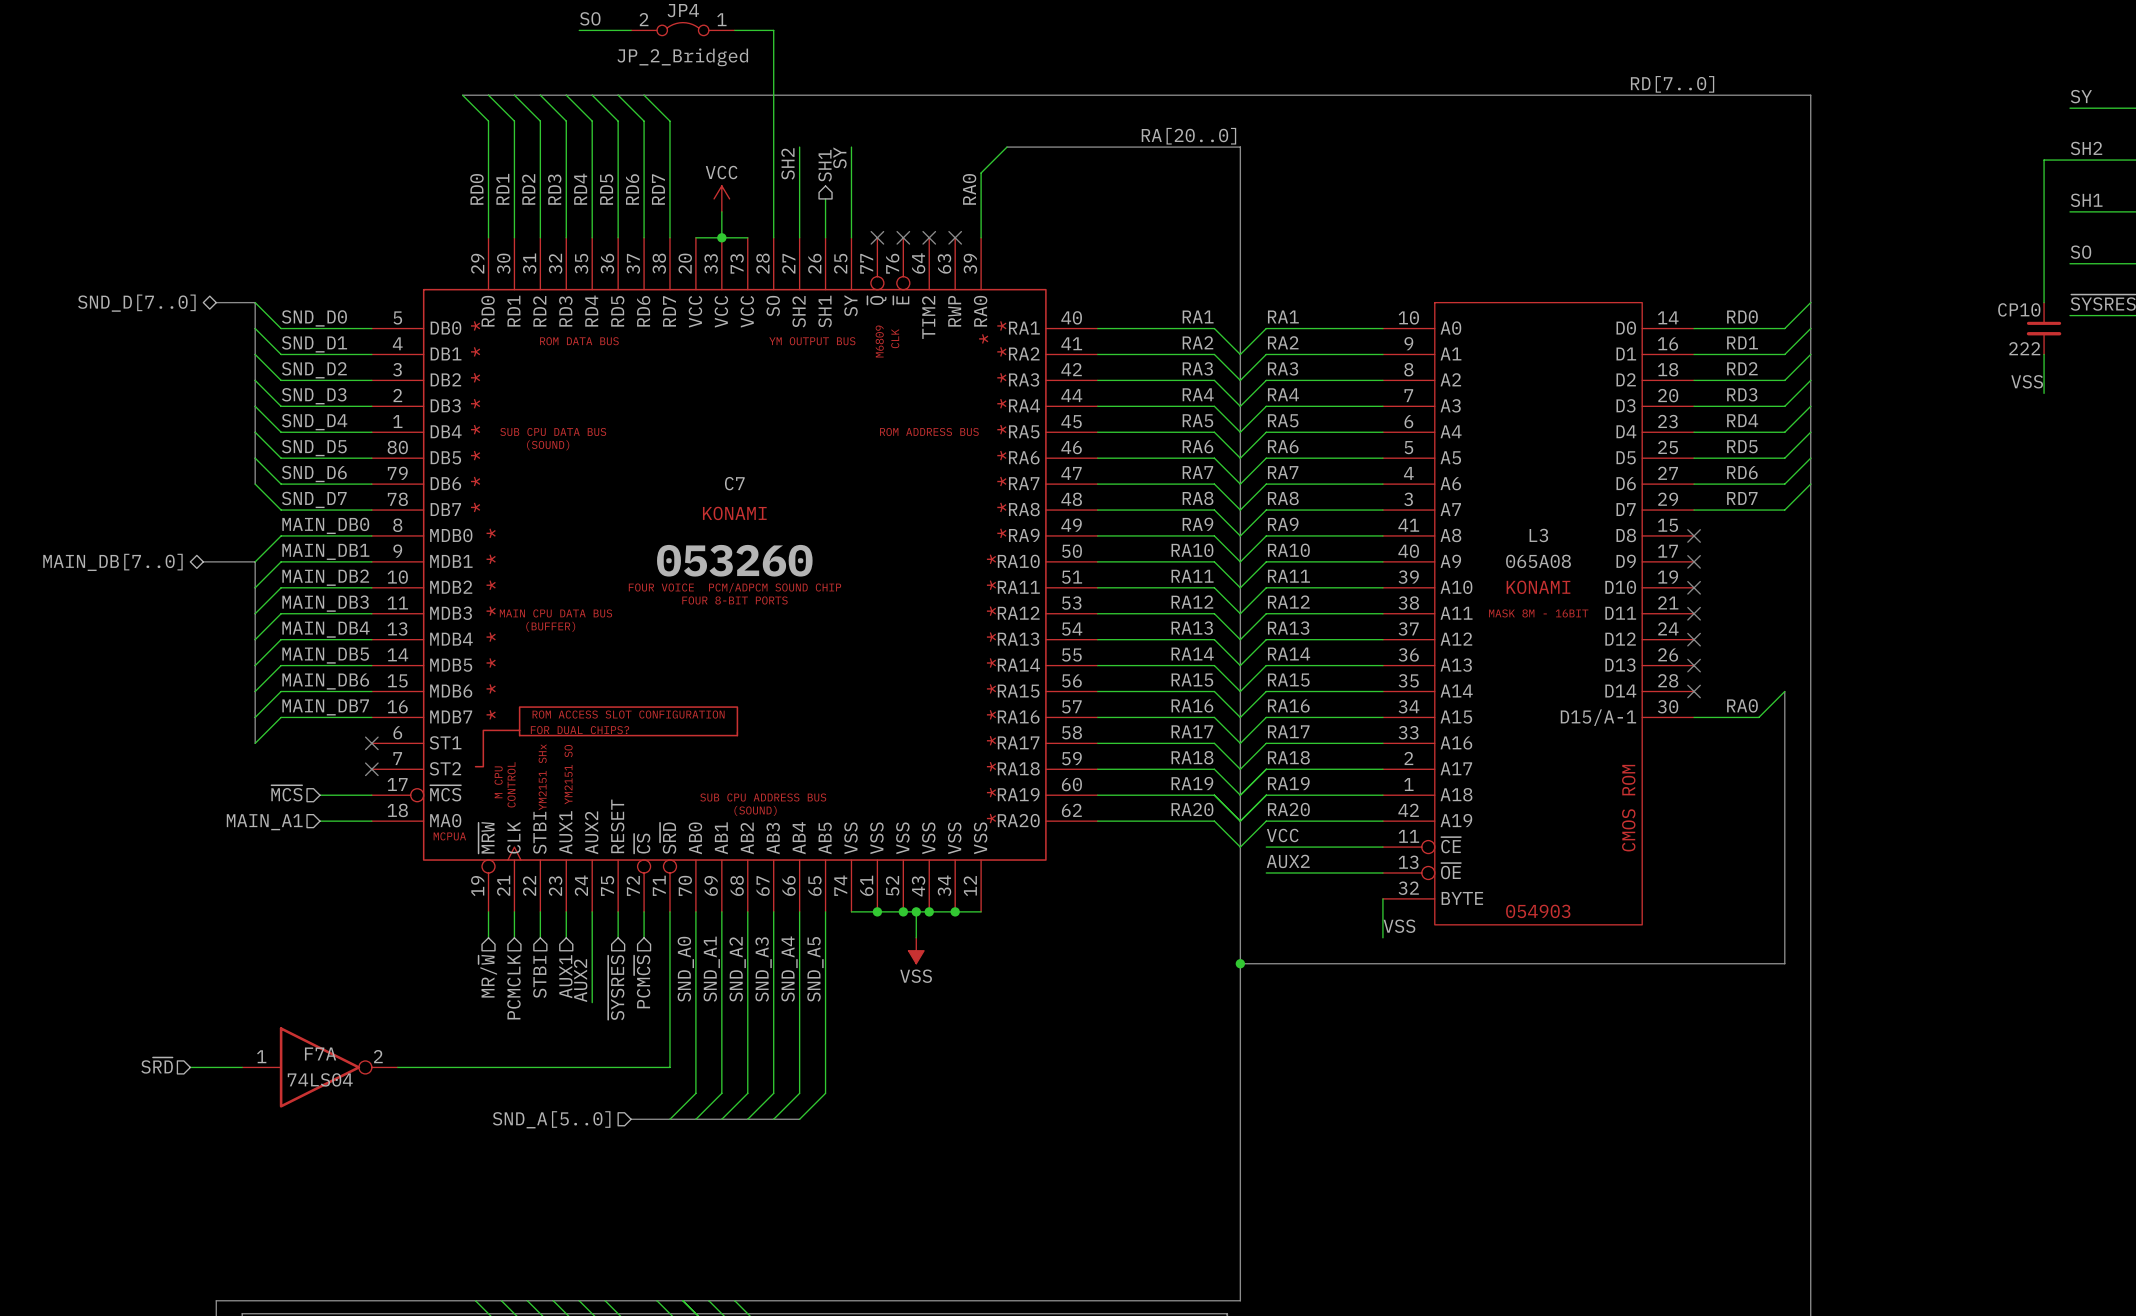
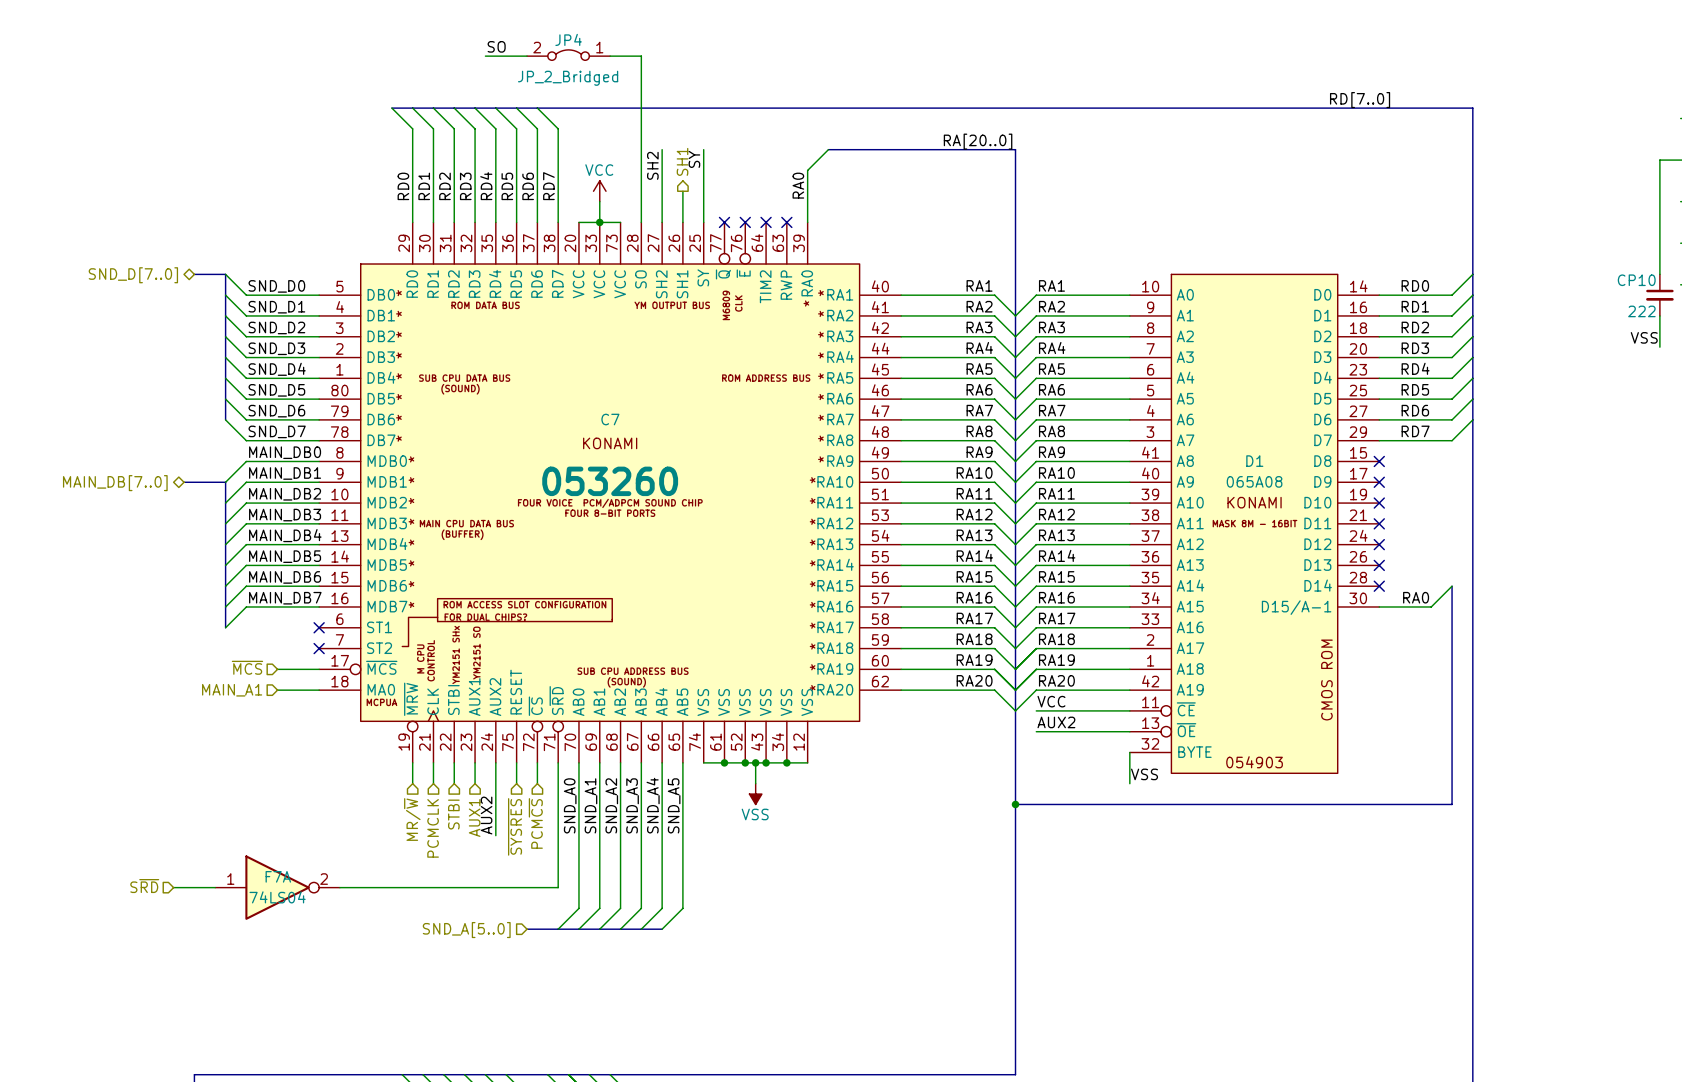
L3 name: L3 (1538, 535) -> D1 (1254, 461)

